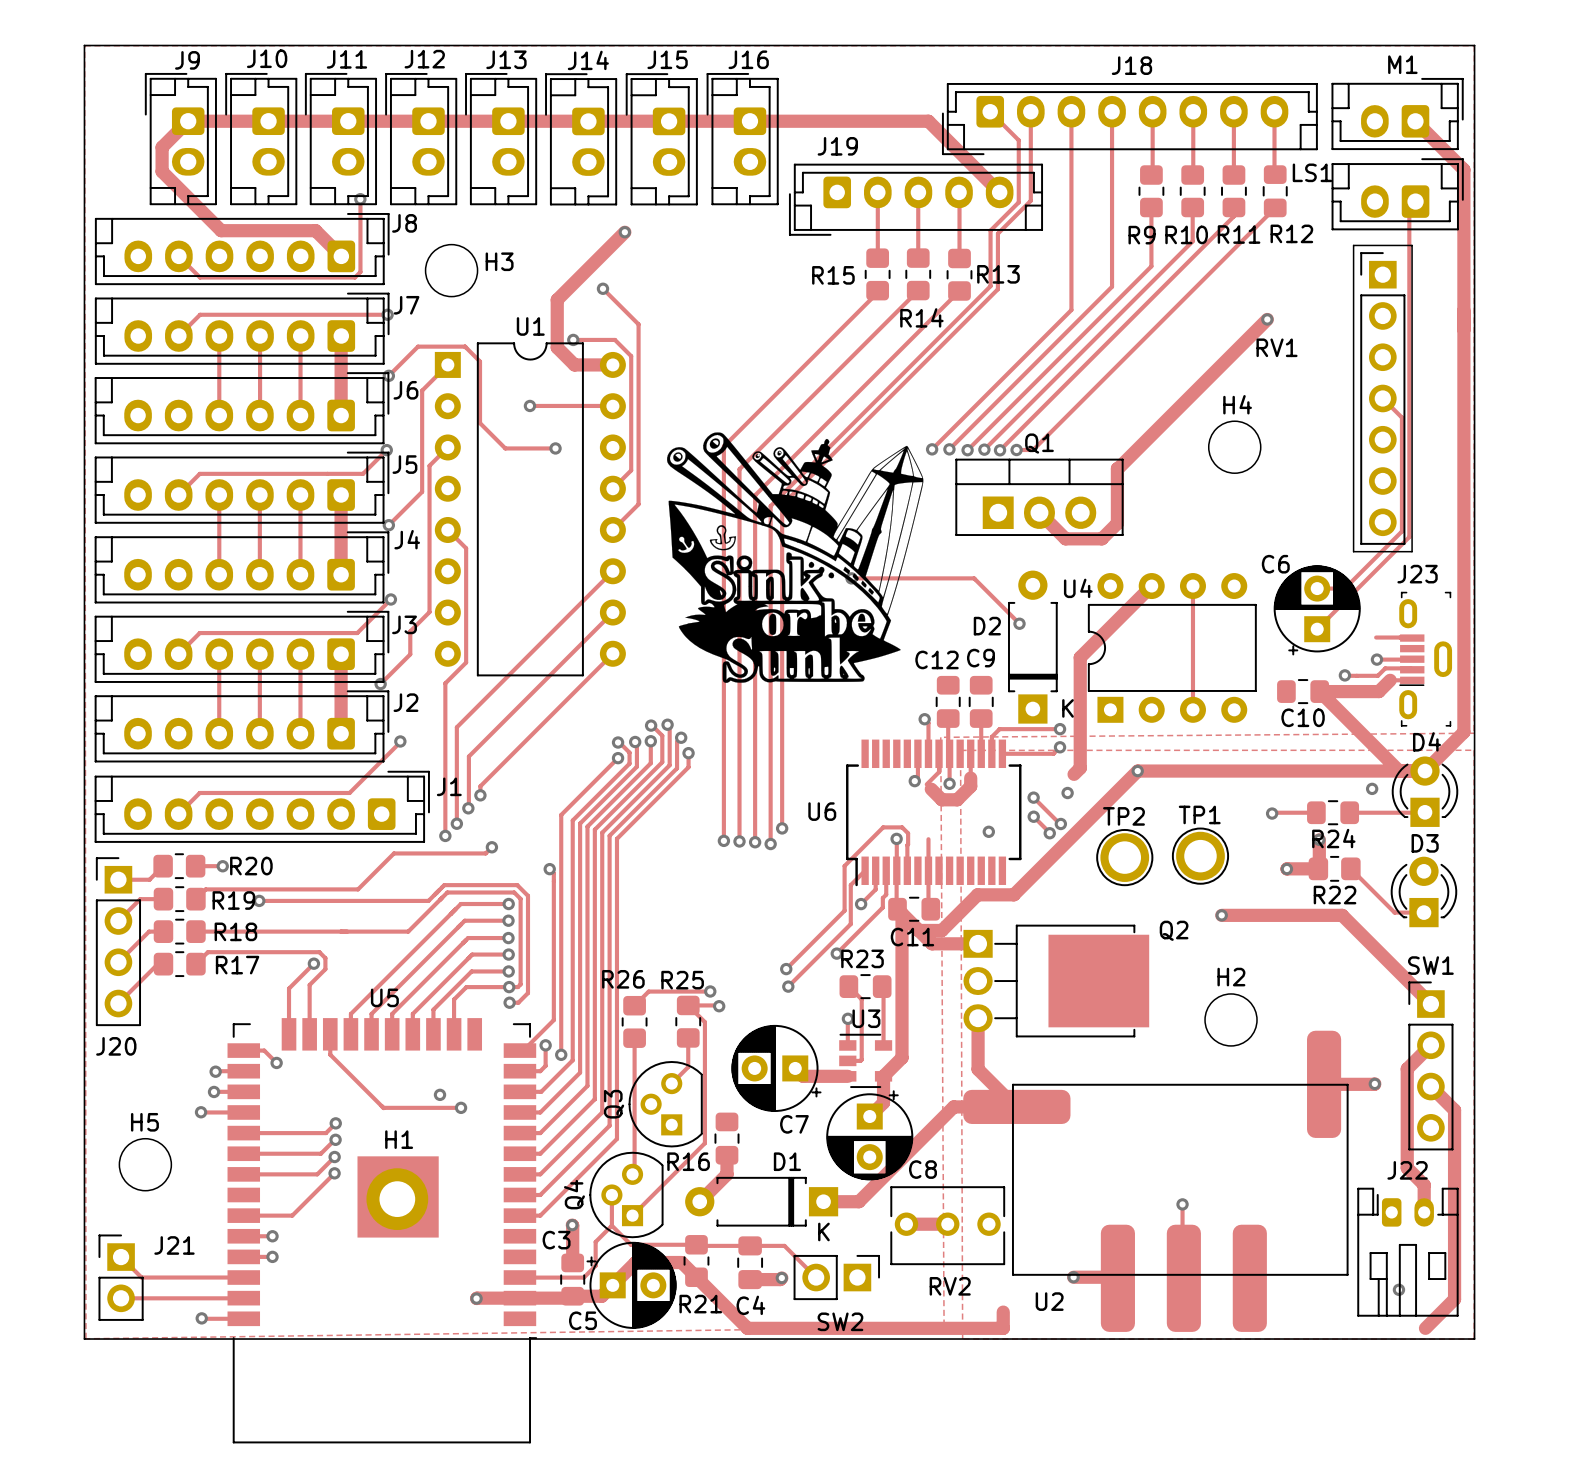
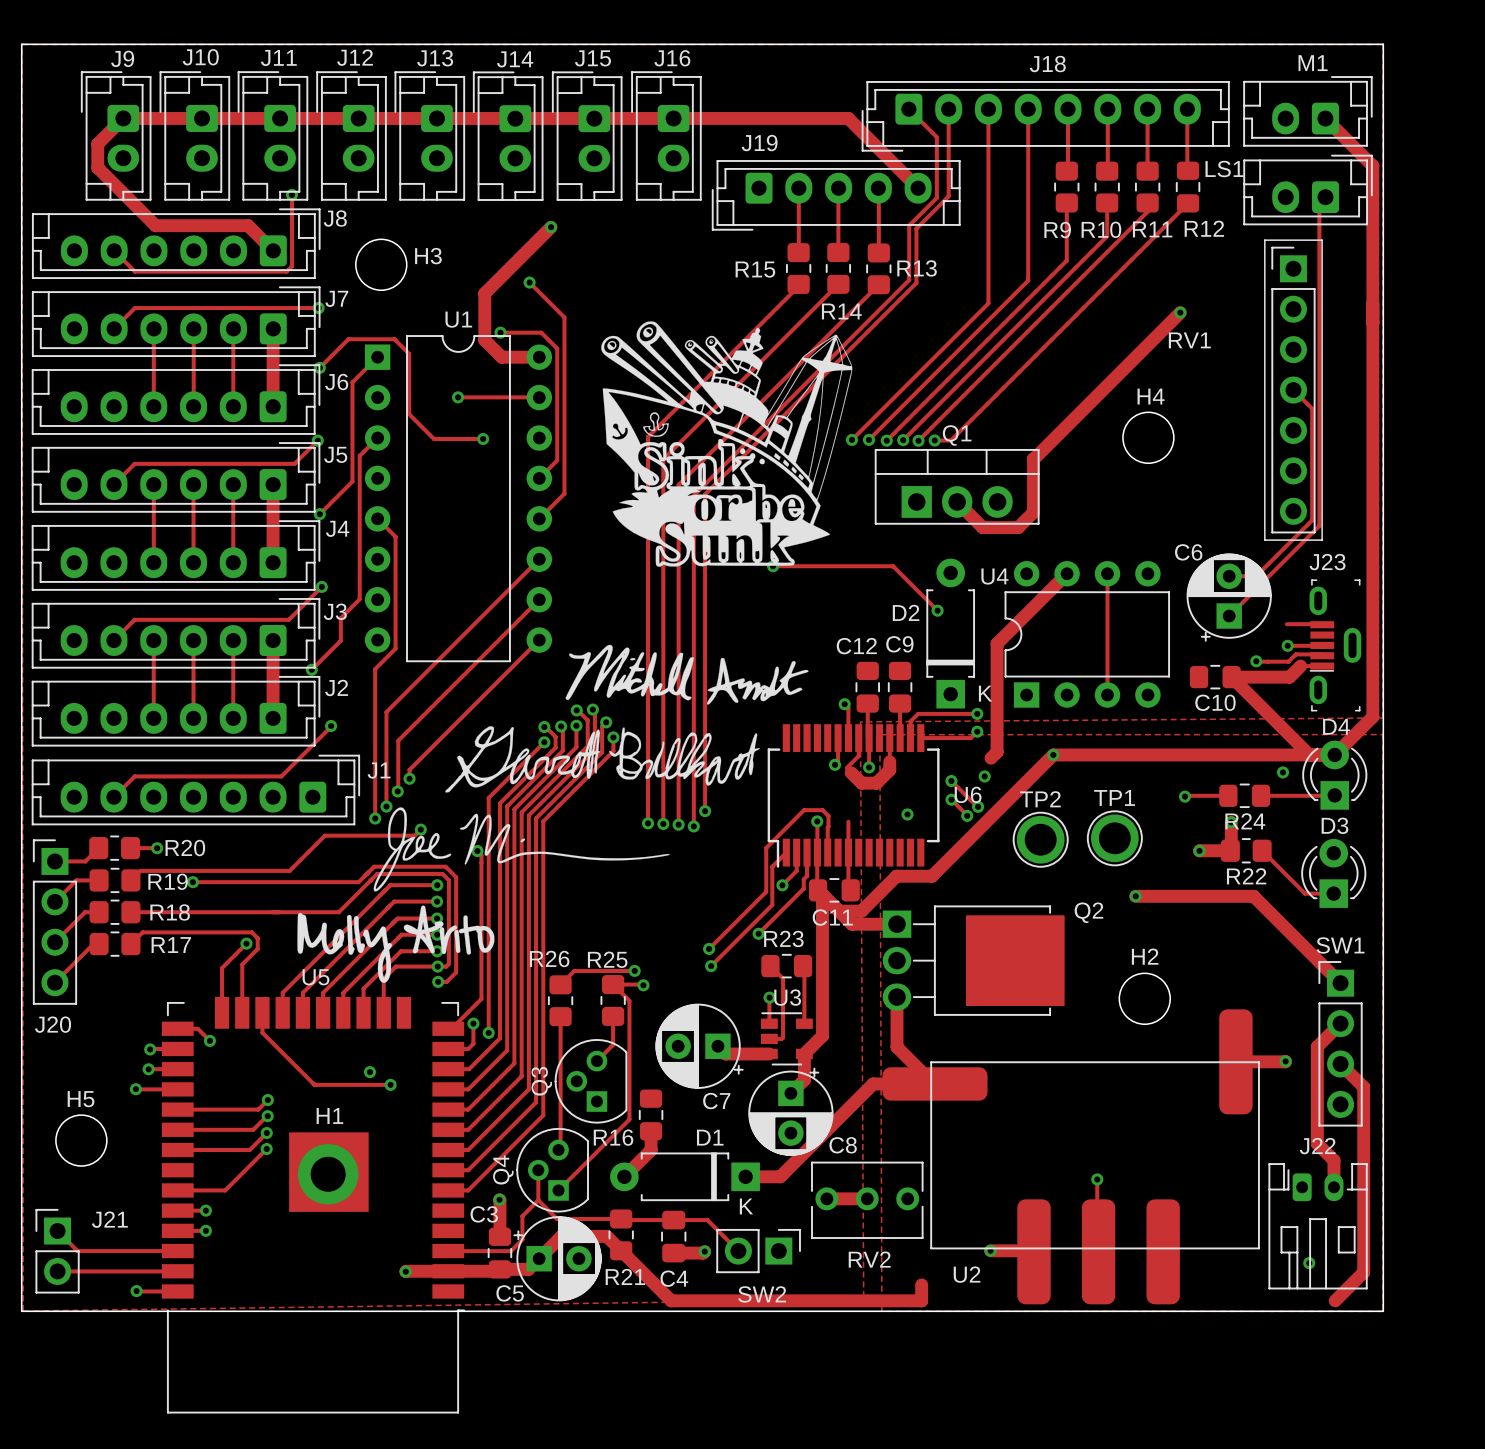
drawing position: (795, 557) -> (726, 444)
drawing: none -> [565, 644, 809, 705]
drawing: none -> [297, 726, 760, 983]
U6 name position: U6 (822, 811) -> U6 (968, 794)

